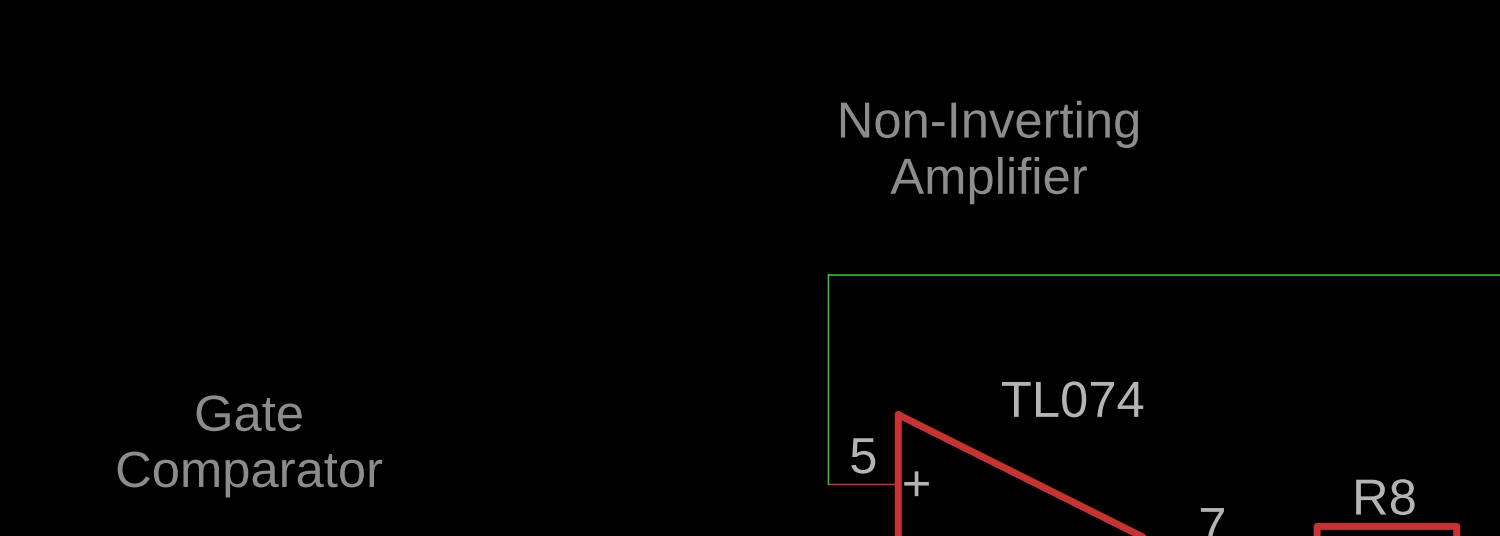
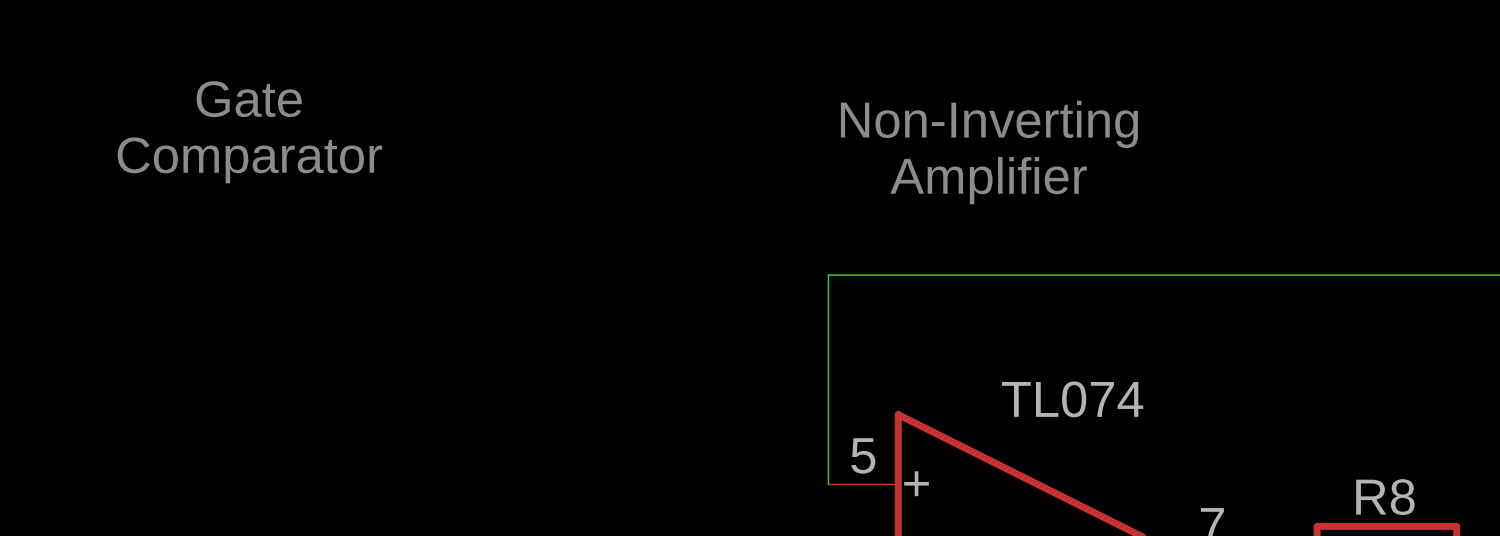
text position: Gate (249, 413) -> Gate (249, 99)
text position: Comparator (249, 474) -> Comparator (249, 160)

